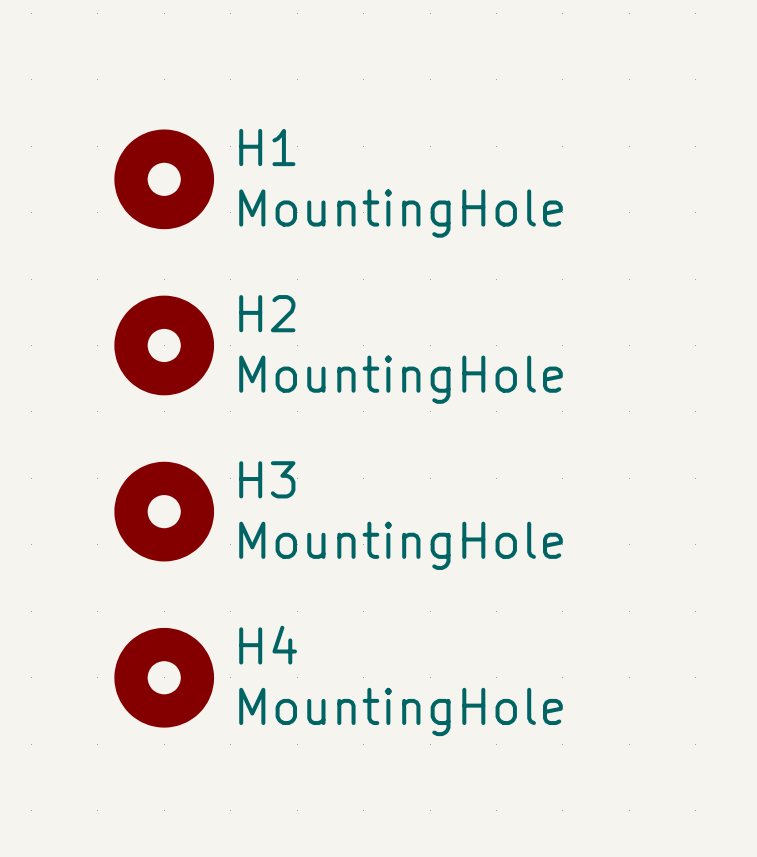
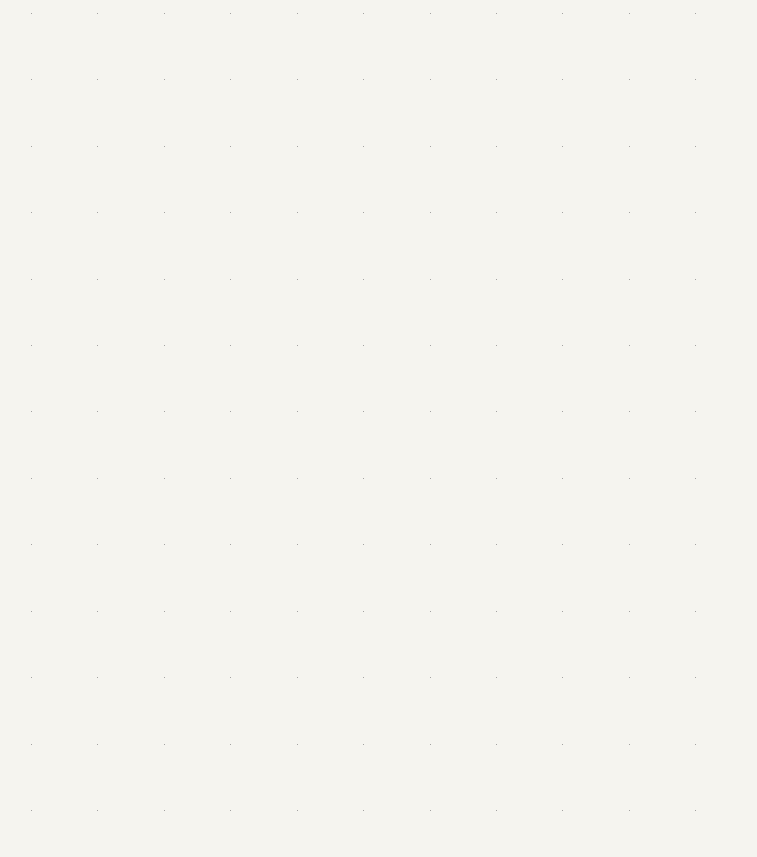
H1: MountingHole (164, 179) -> none
H2: MountingHole (164, 345) -> none
H3: MountingHole (164, 511) -> none
H4: MountingHole (164, 677) -> none

